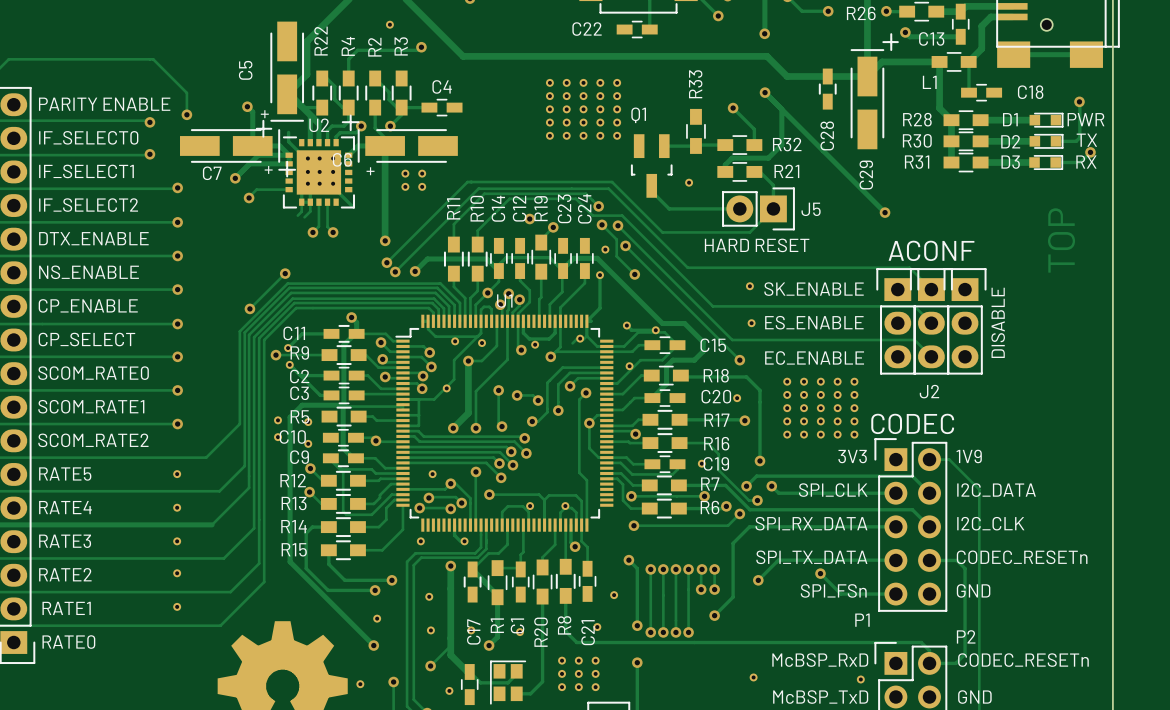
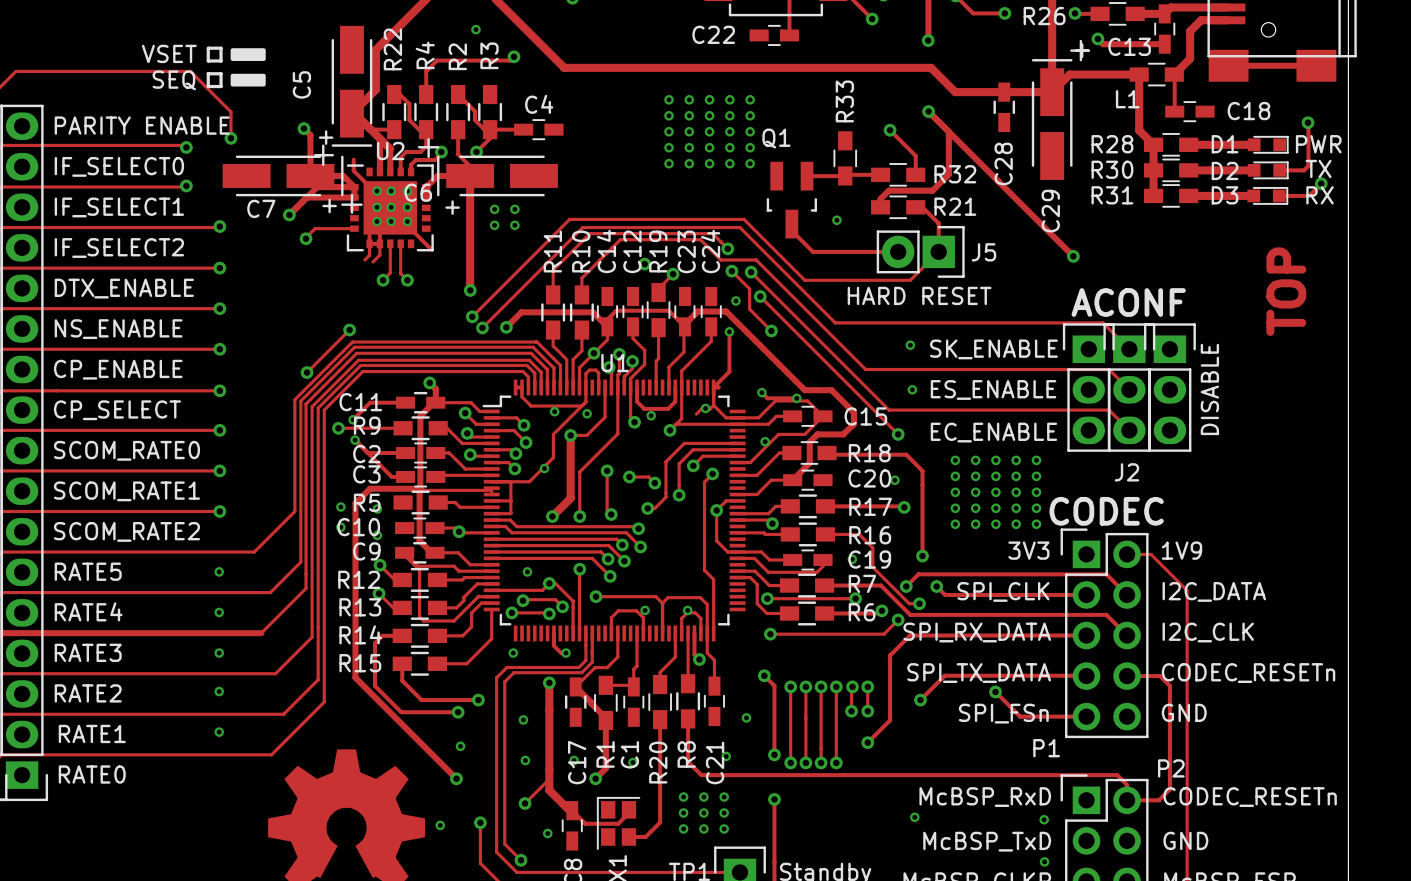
line: none -> (208, 48) (208, 60) (221, 60) (221, 48) (208, 48)
drawing: none -> [230, 48, 266, 87]
text: none -> VSET (169, 53)
line: none -> (208, 73) (208, 86) (221, 86) (221, 73) (208, 73)
text: none -> SEQ (174, 80)

